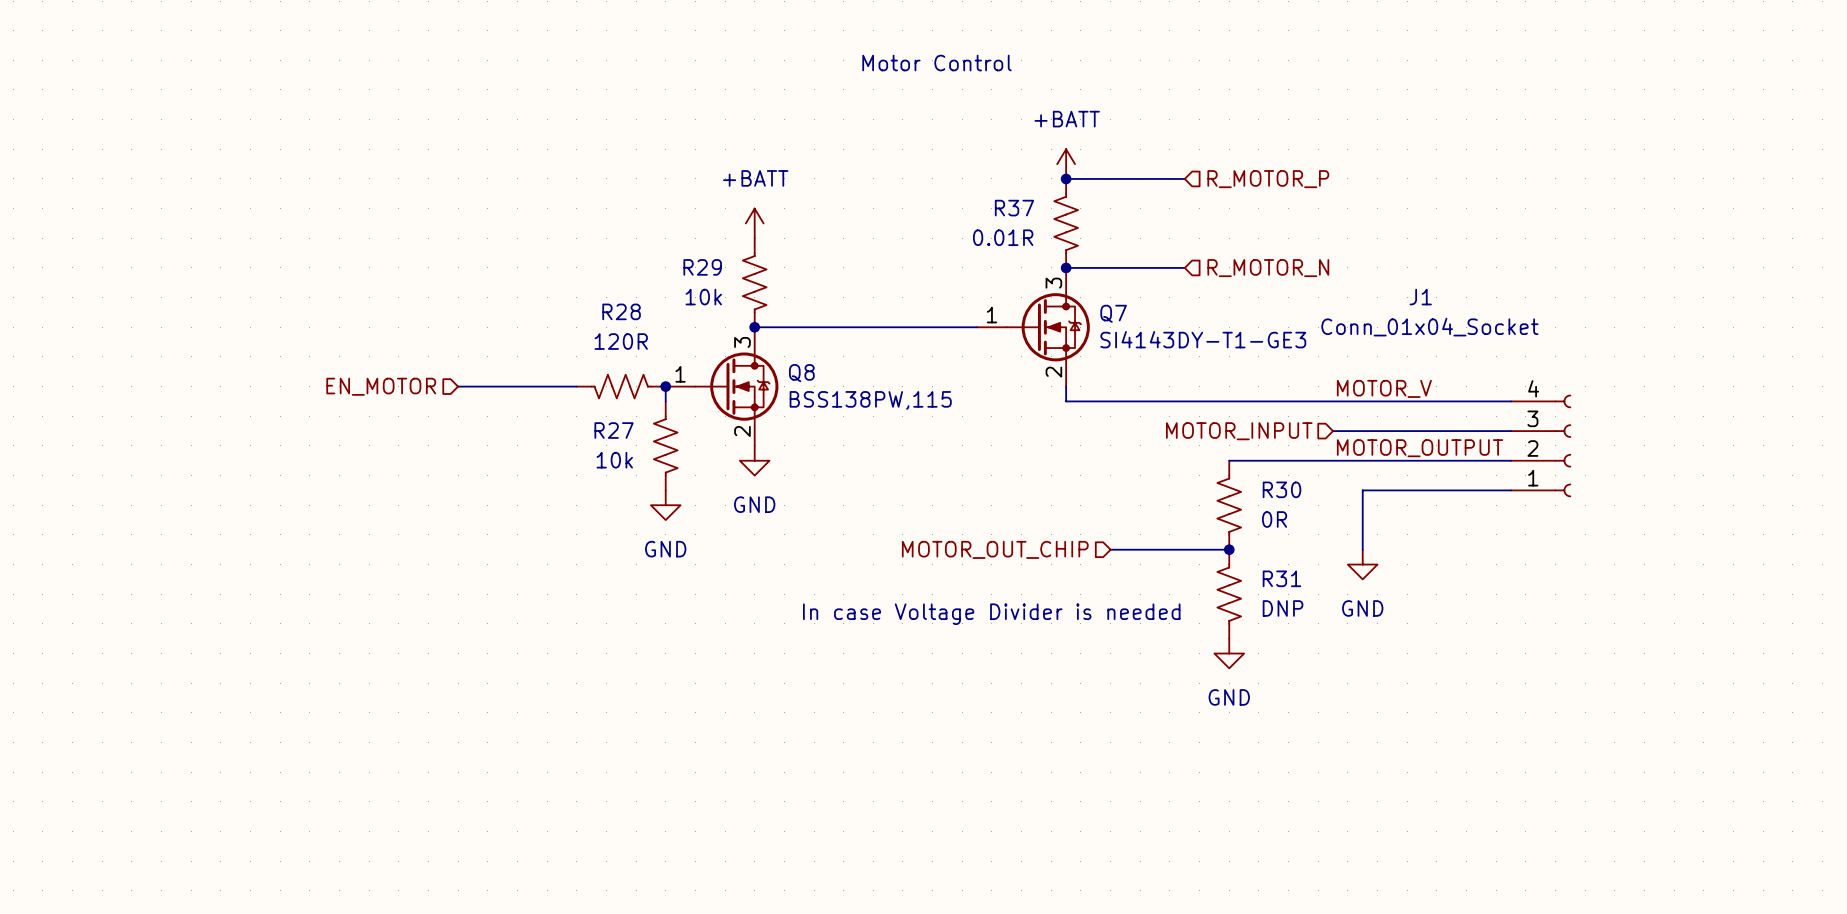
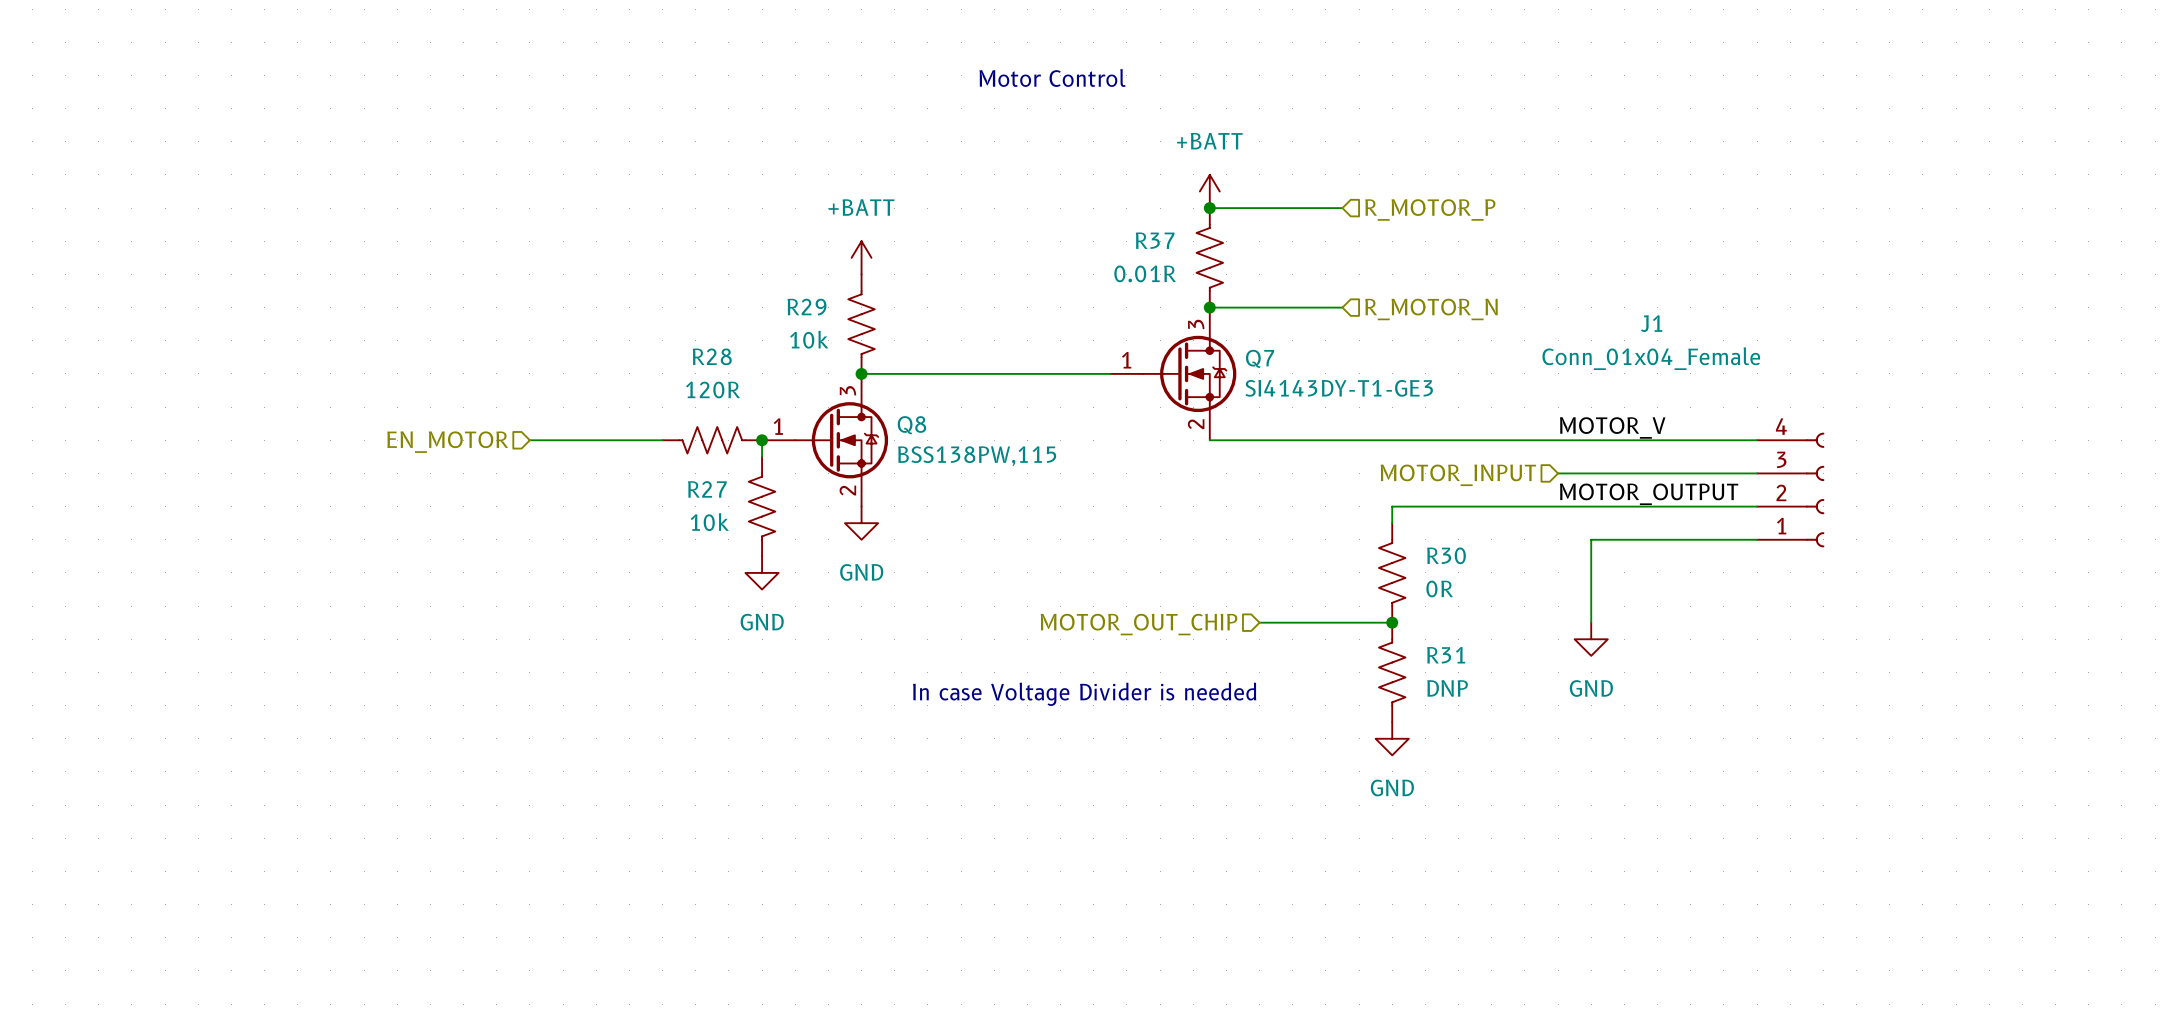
J1 value: Conn_01x04_Socket (1429, 327) -> Conn_01x04_Female (1651, 358)
wire: (1066, 386) (1066, 401) (1511, 401) -> (1209, 440) (1757, 440)
label position: MOTOR_V (1384, 388) -> MOTOR_V (1612, 427)
hierarchical label position: MOTOR_INPUT (1239, 431) -> MOTOR_INPUT (1458, 475)
wire: (1333, 431) (1511, 431) -> (1558, 473) (1757, 473)
J1 position: (1541, 445) -> (1790, 490)
label position: MOTOR_OUTPUT (1420, 448) -> MOTOR_OUTPUT (1649, 494)
wire: (1229, 460) (1511, 460) -> (1392, 523) (1392, 506) (1757, 506)
wire: none -> (1757, 539) (1591, 539) (1591, 622)
wire: (1511, 490) (1362, 490) (1362, 549) -> none
power symbol position: GND (1362, 564) -> GND (1591, 639)

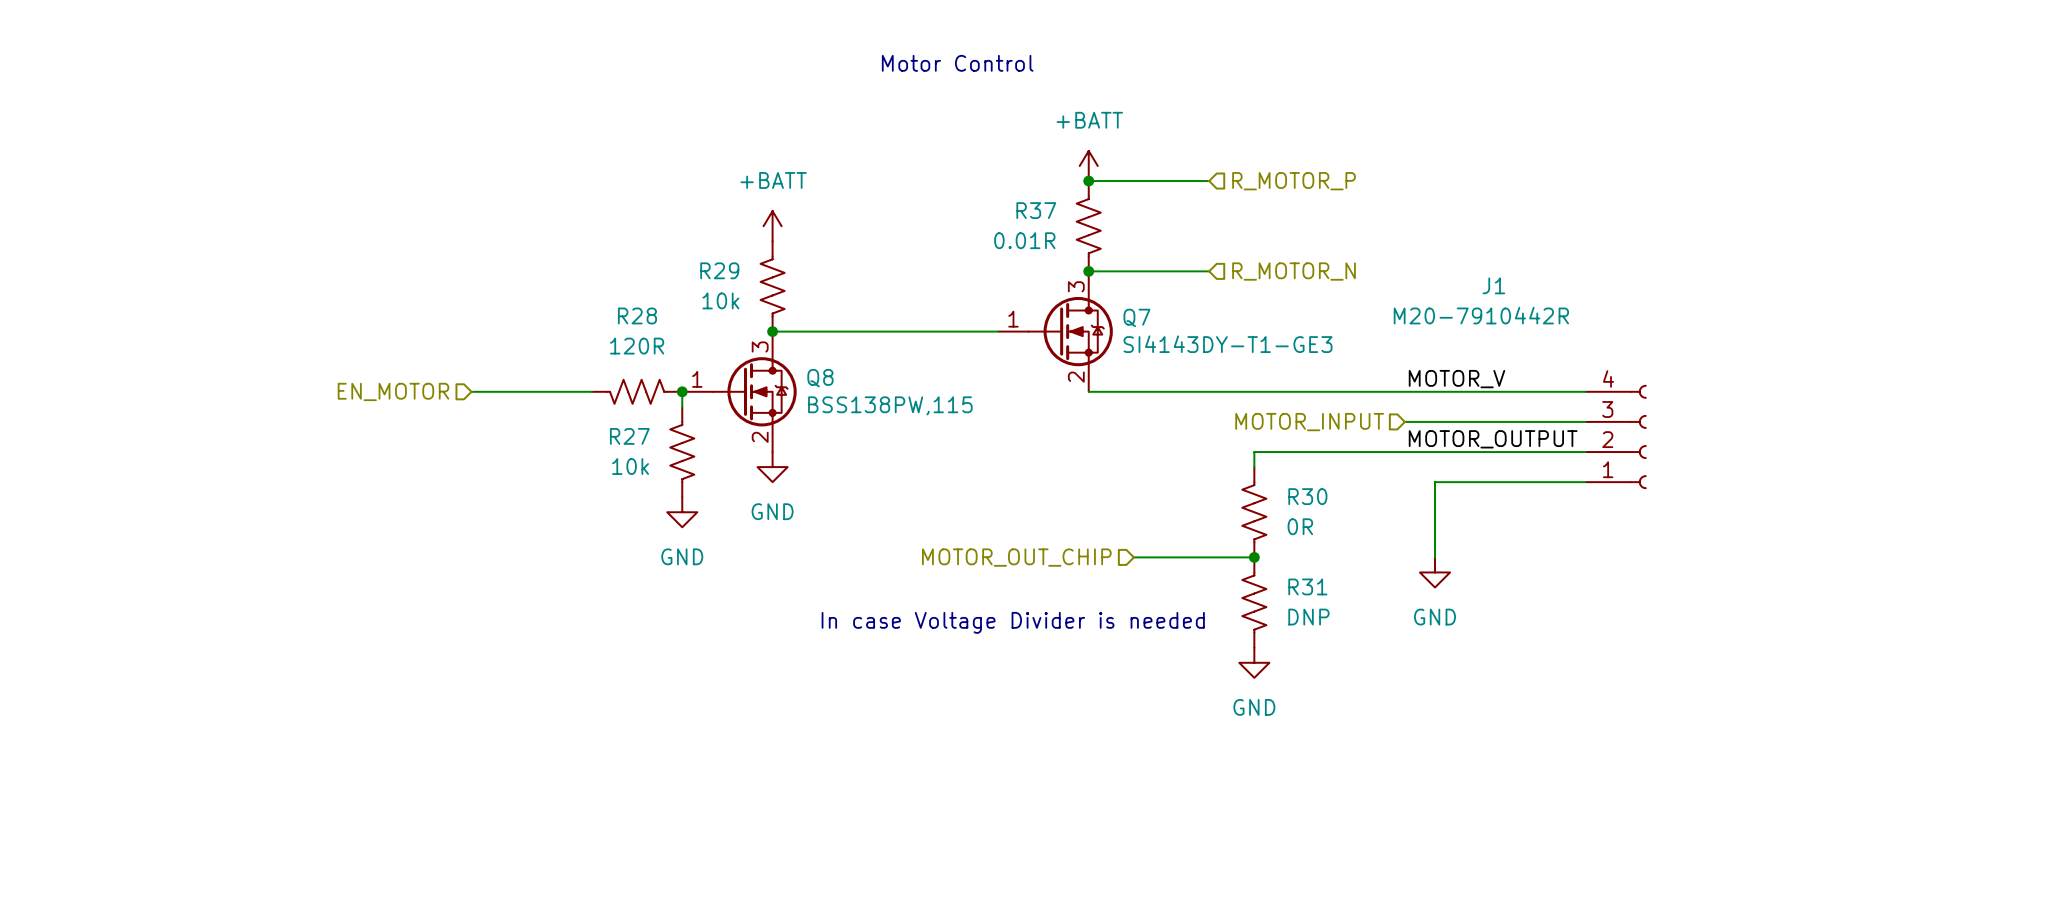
J1 value: Conn_01x04_Female (1651, 358) -> M20-7910442R (1481, 315)

